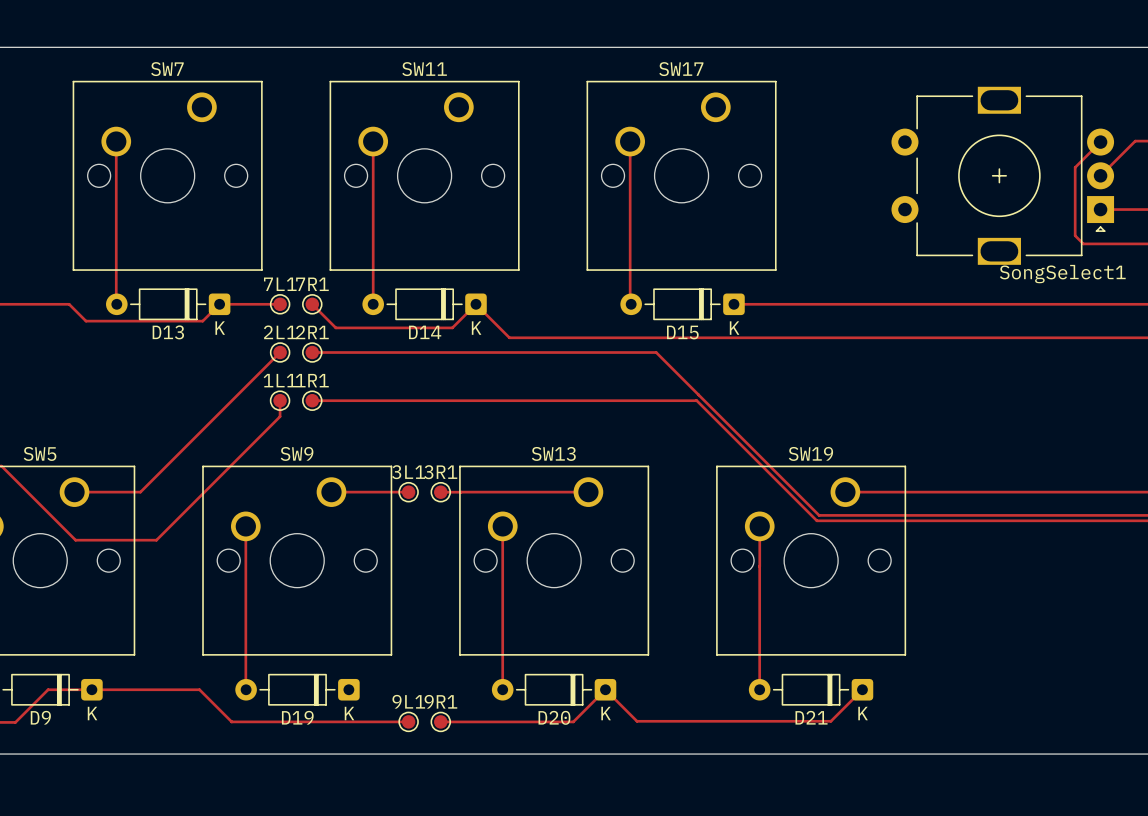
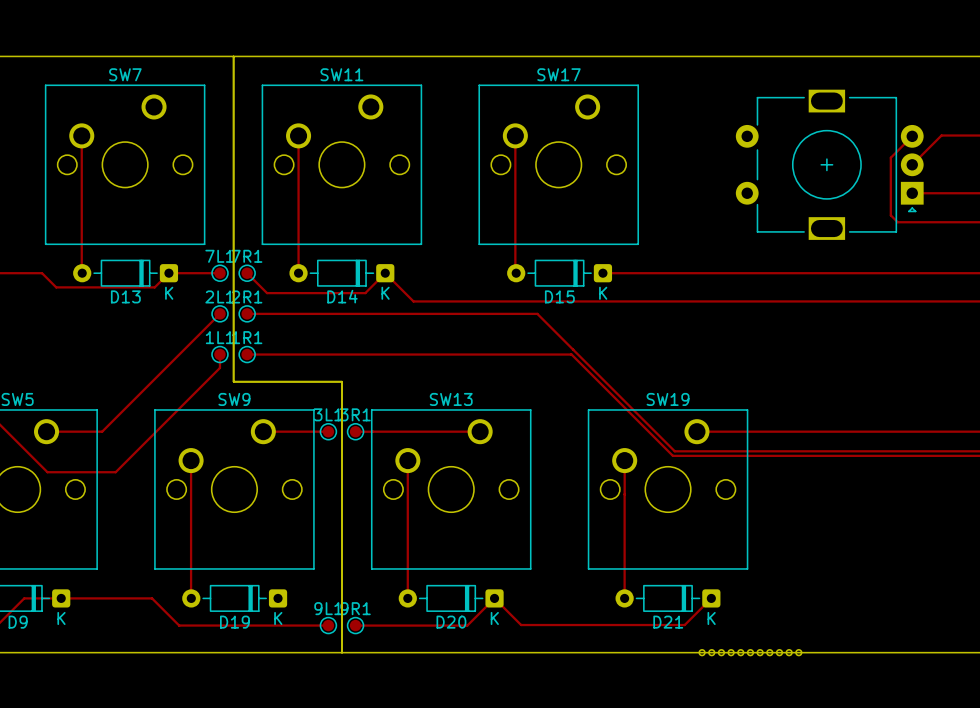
board edge: none -> (233, 56) (233, 381) (342, 381)
SongSelect1 name: SongSelect1 (1062, 274) -> none
board edge: none -> (233, 381) (342, 381) (342, 652)
part: none -> (750, 652)

